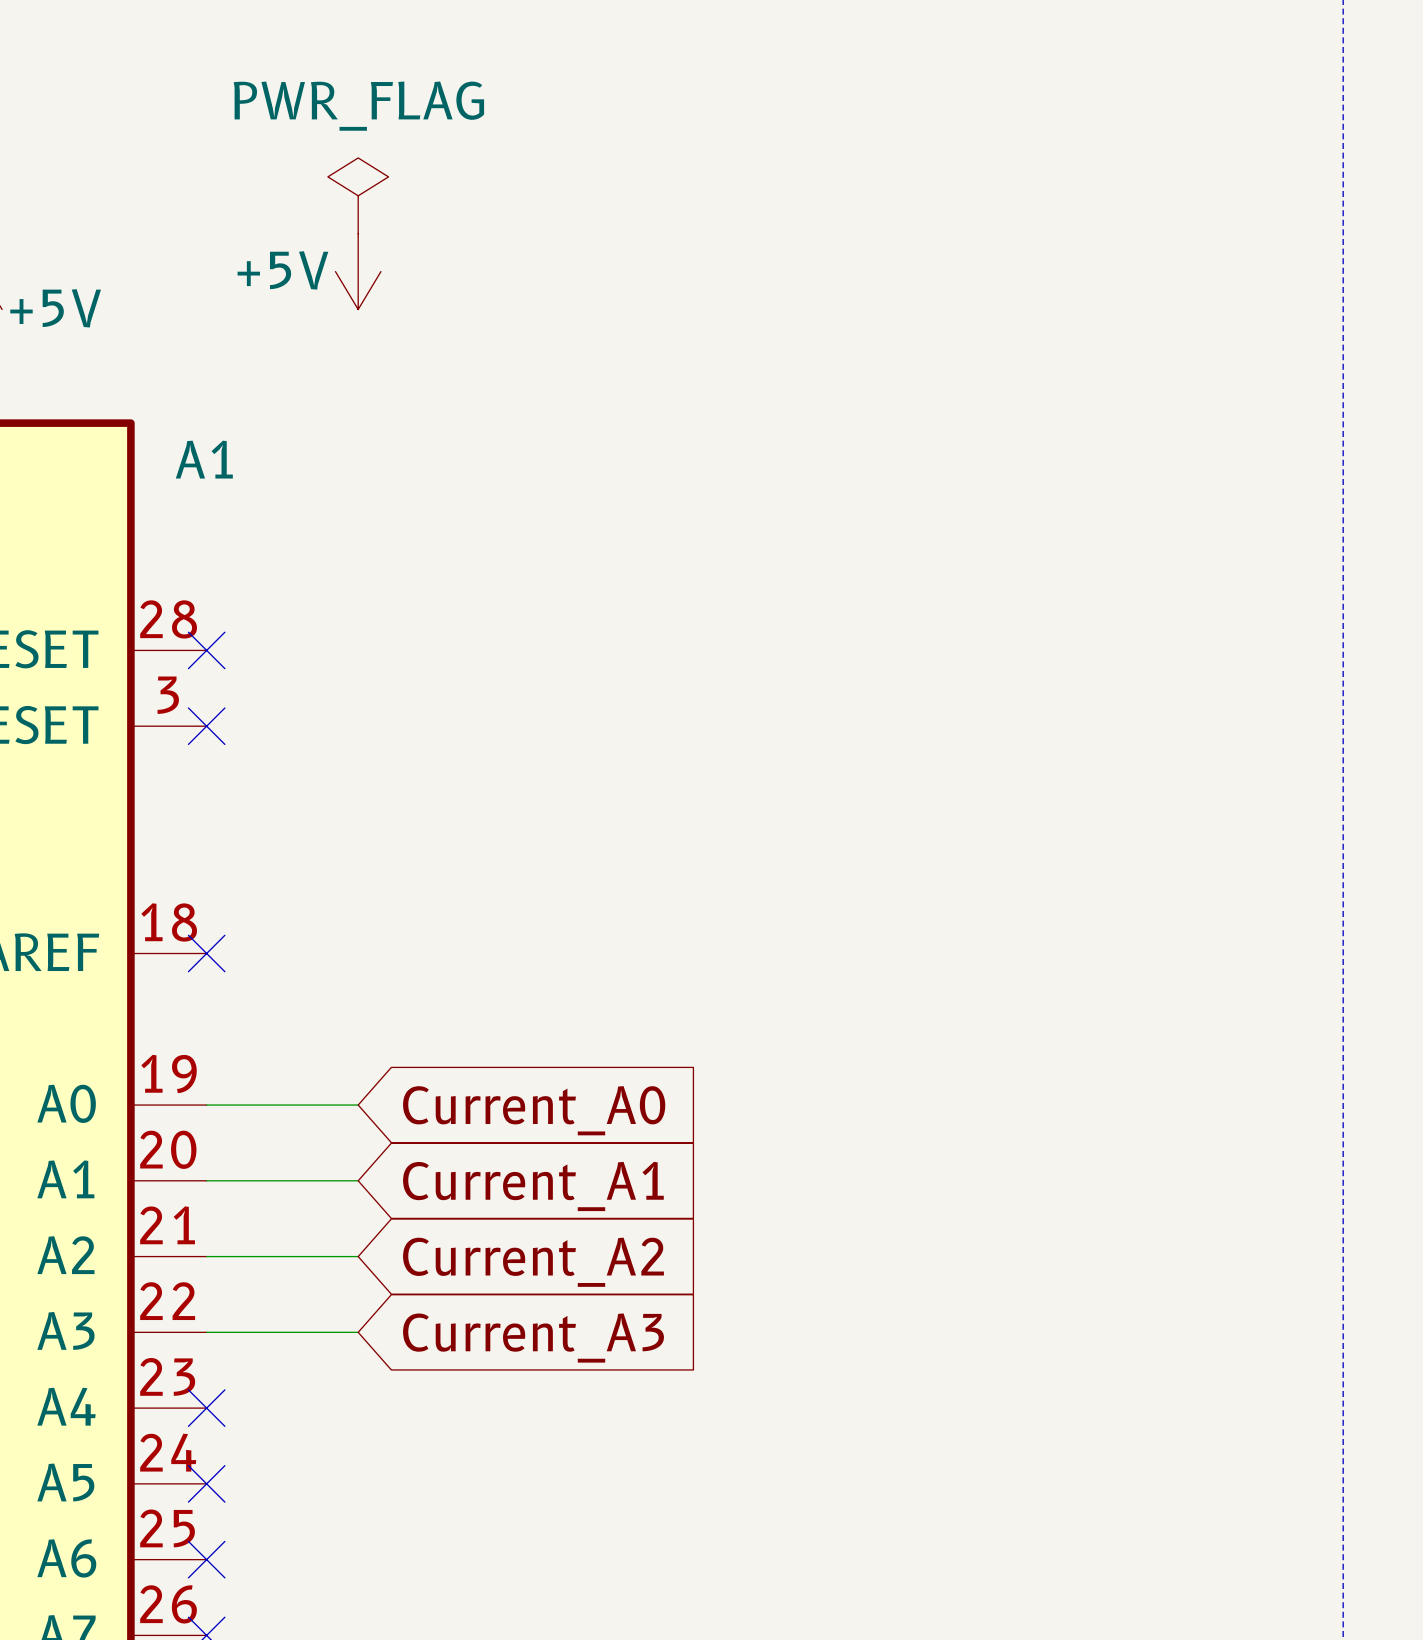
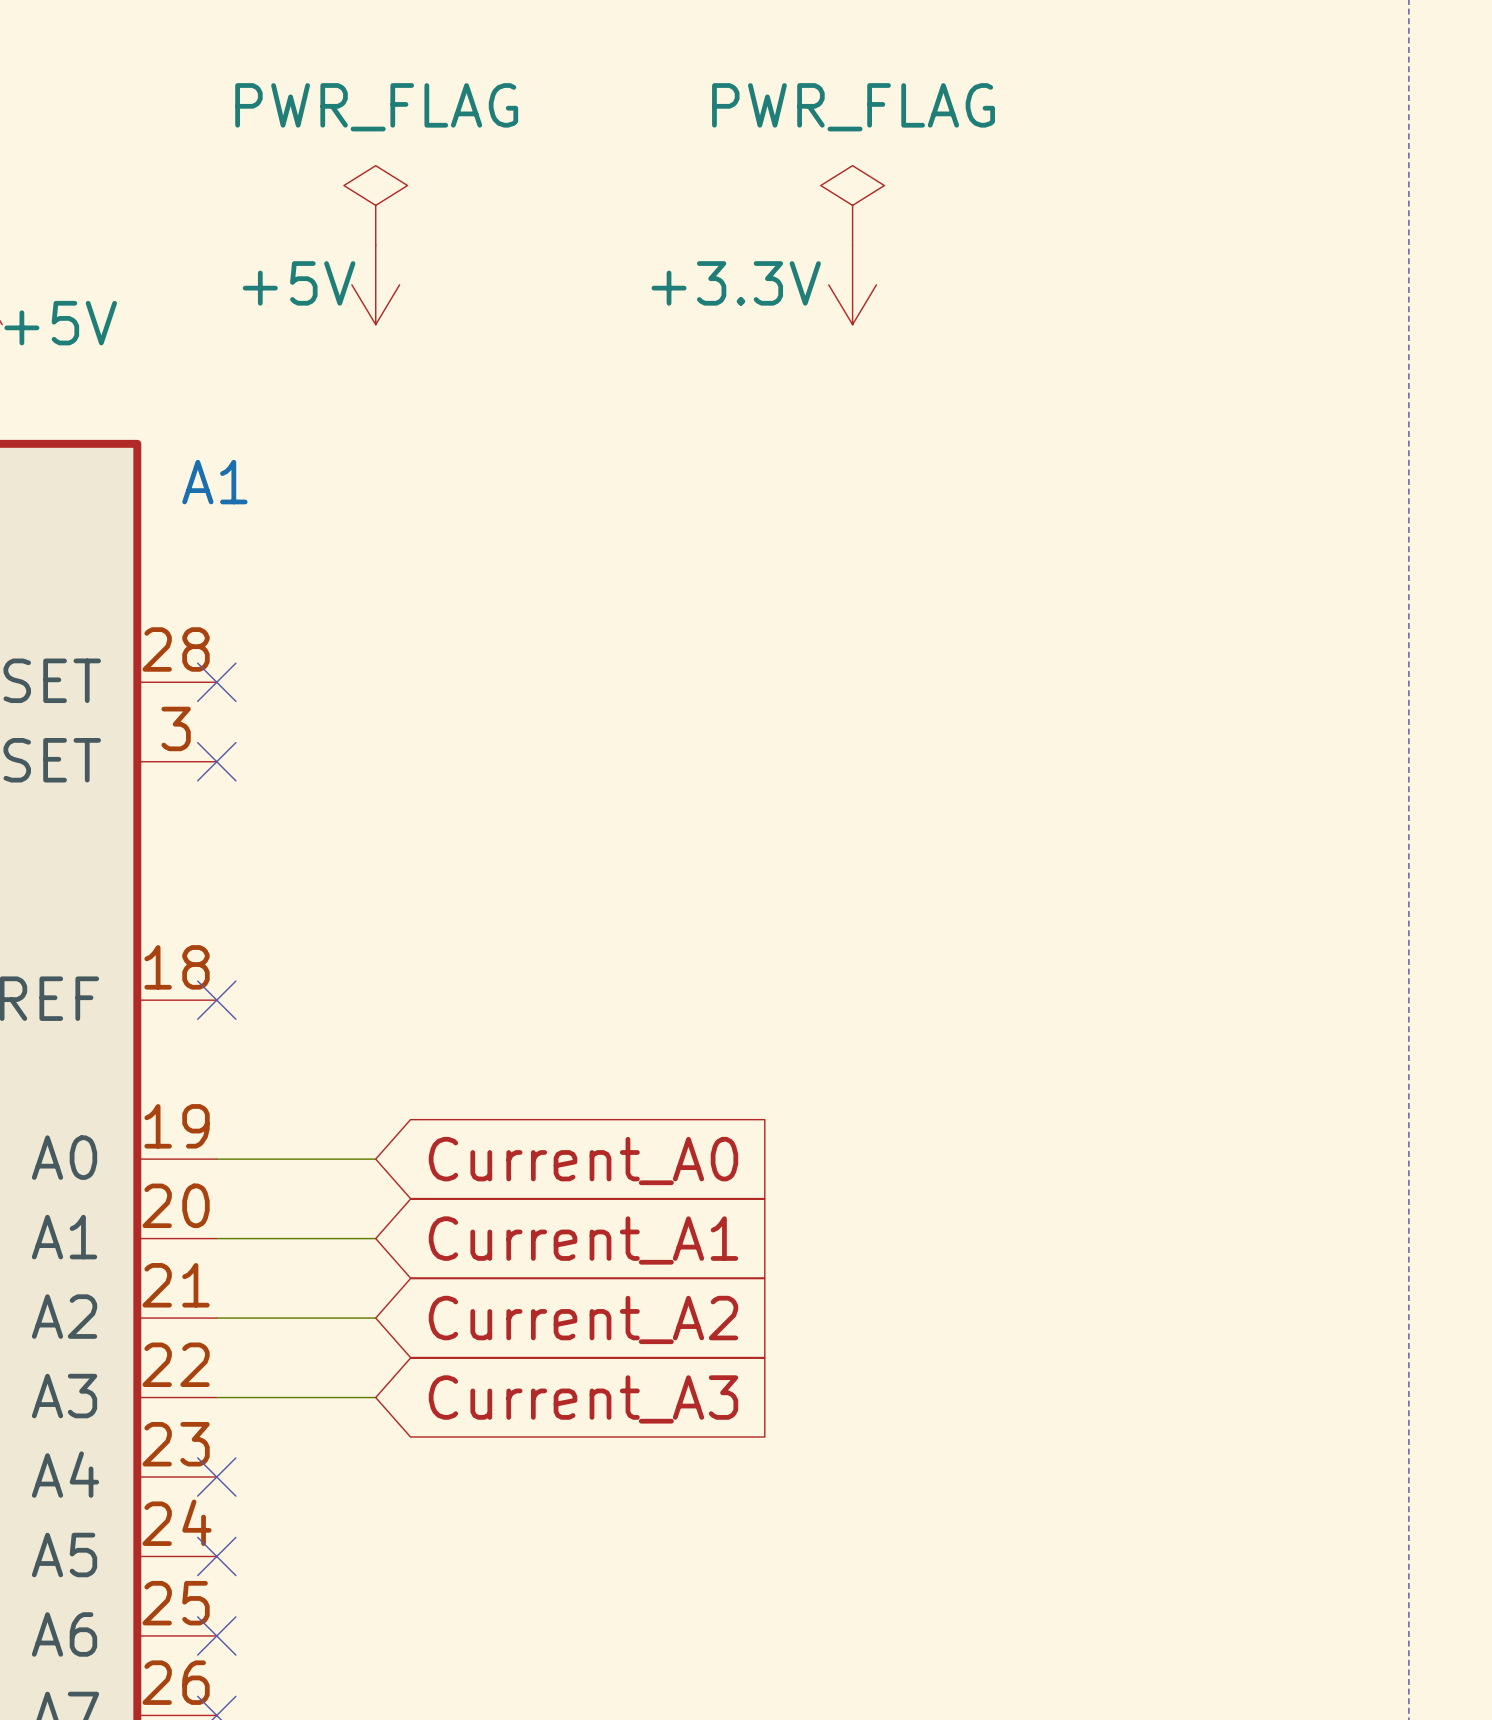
power symbol: none -> PWR_FLAG (852, 205)
power symbol: none -> +3.3V (852, 284)

